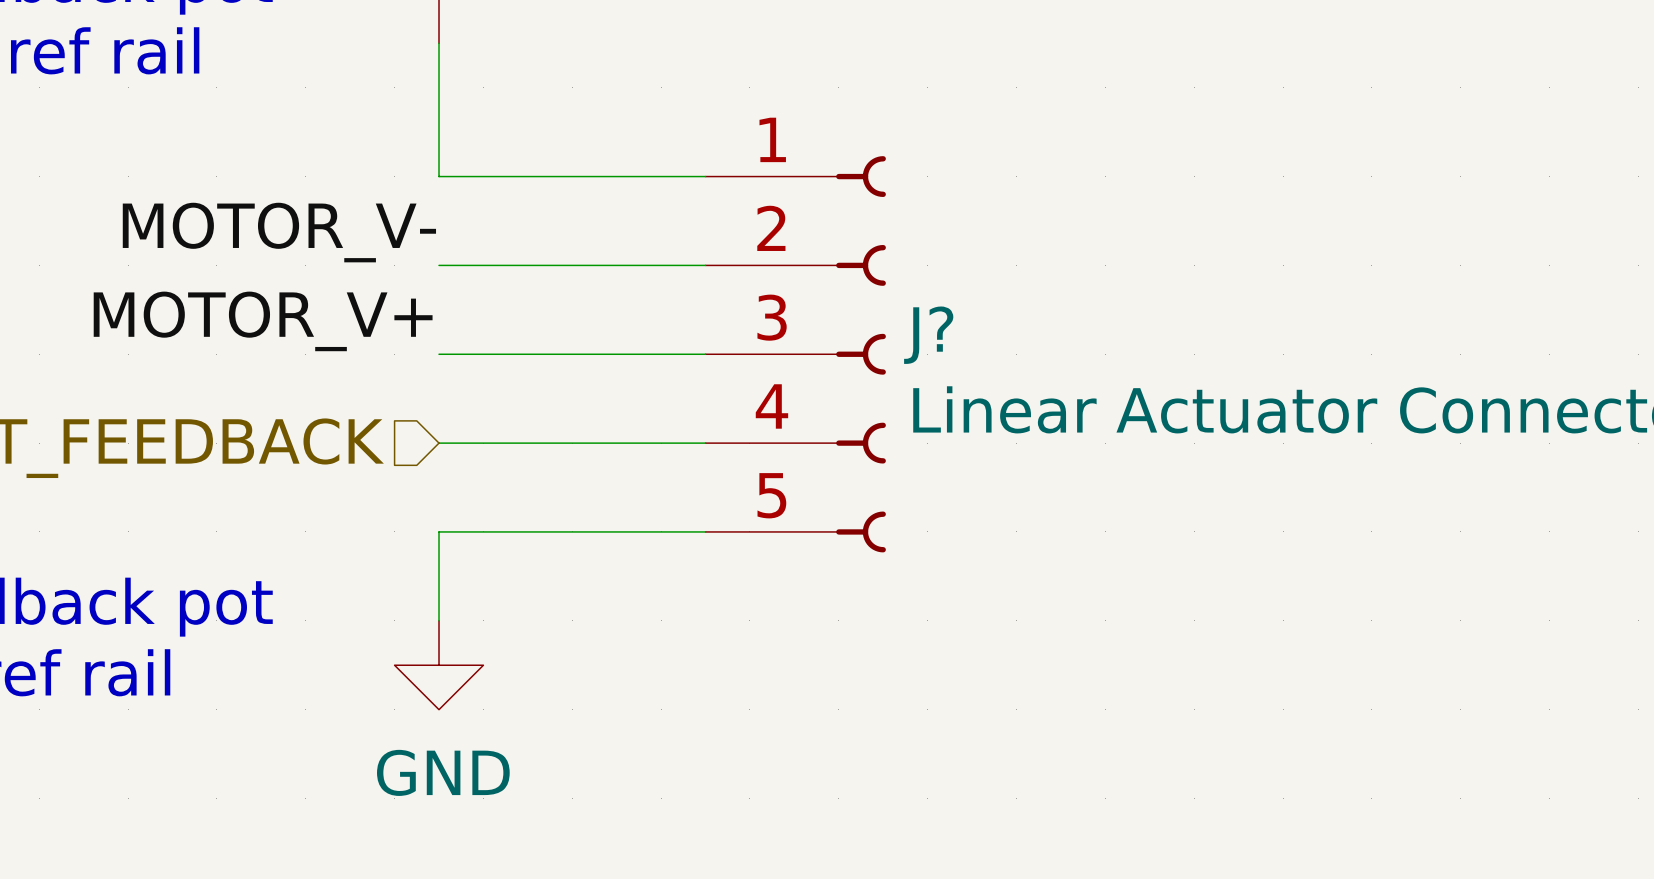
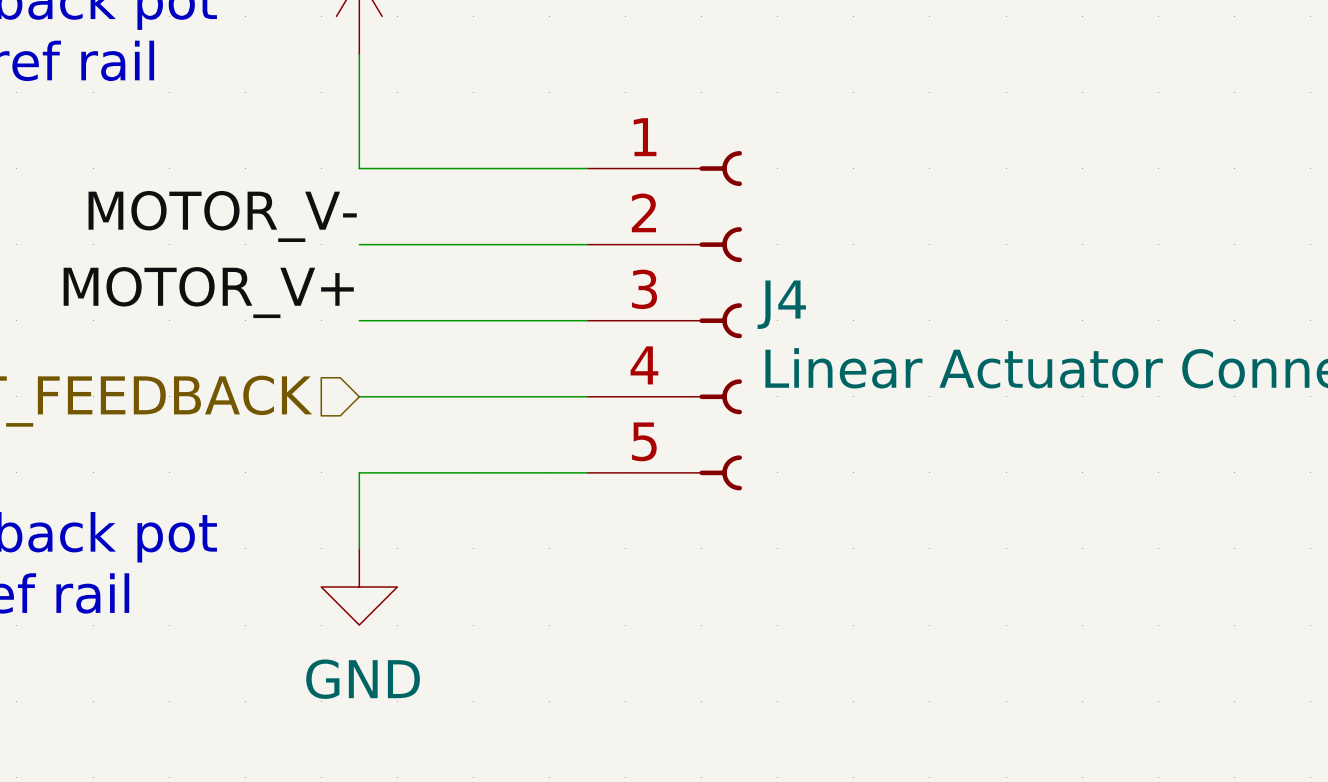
J? name: J? (928, 335) -> J4 (781, 304)

